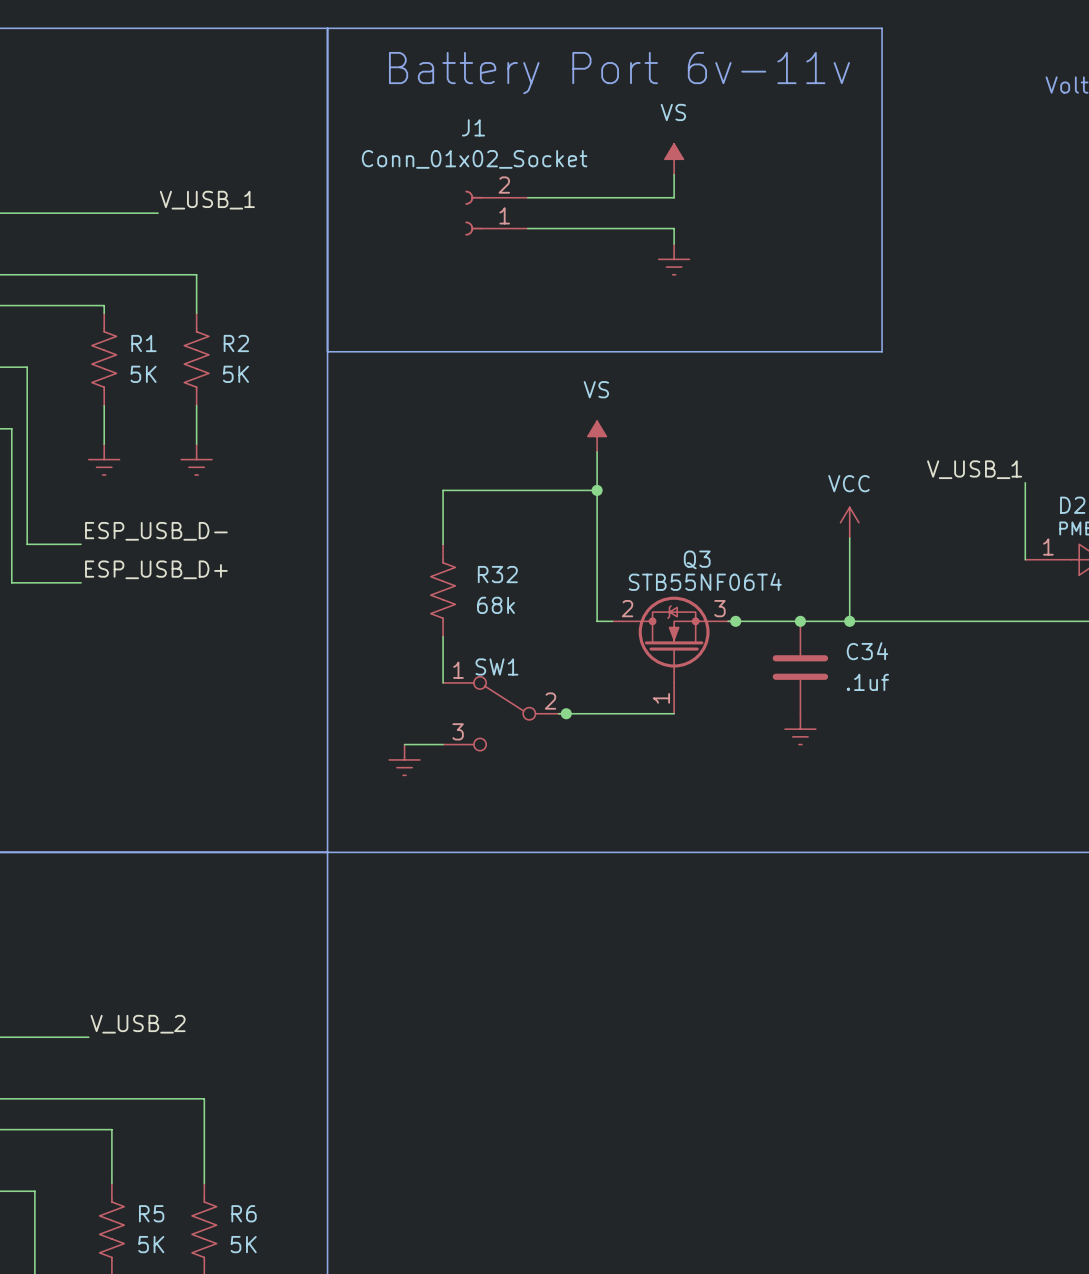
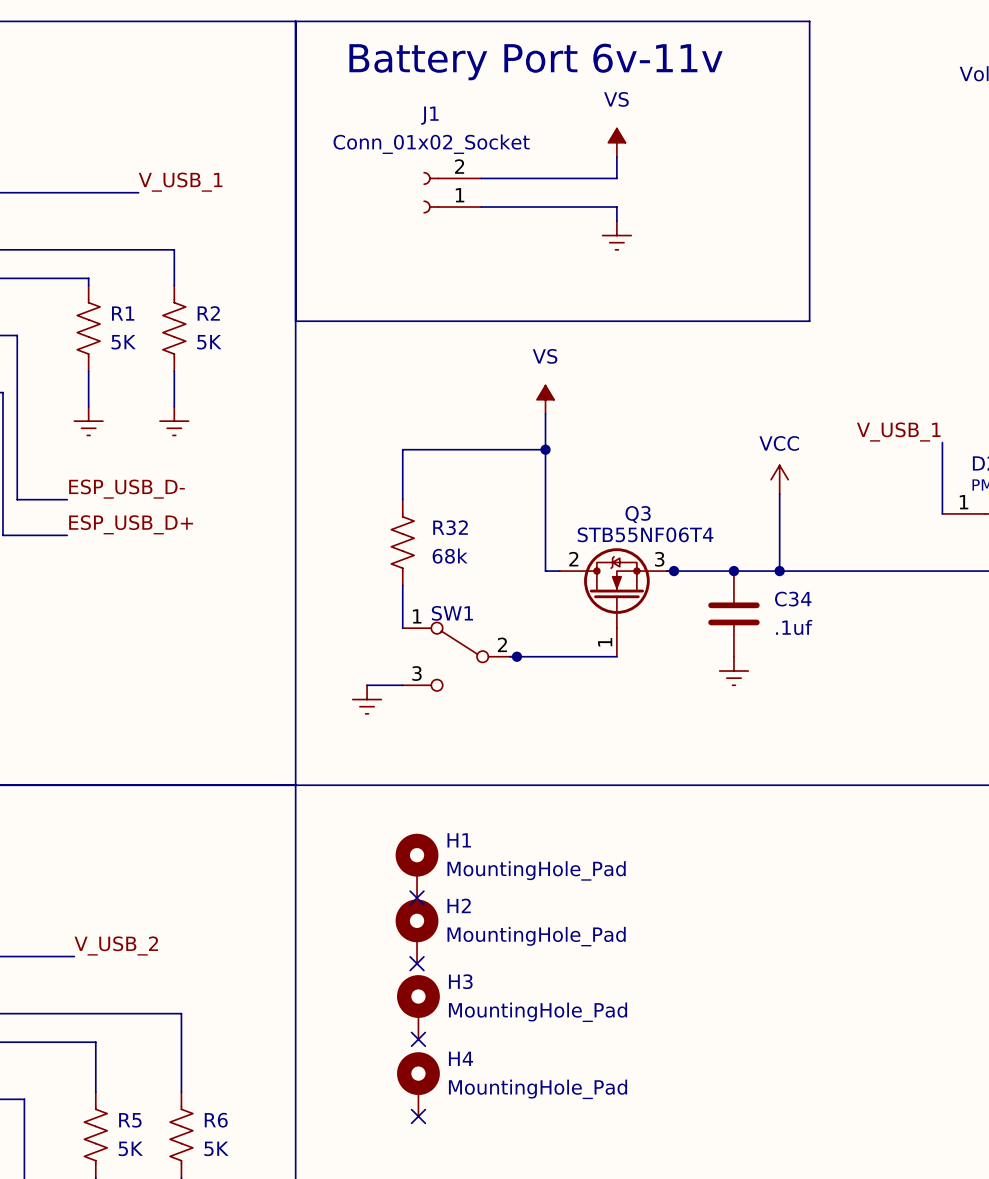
H1: none -> MountingHole_Pad (417, 865)
no-connect mark: none -> (417, 898)
H2: none -> MountingHole_Pad (417, 931)
no-connect mark: none -> (417, 963)
H3: none -> MountingHole_Pad (418, 1007)
no-connect mark: none -> (418, 1039)
H4: none -> MountingHole_Pad (418, 1084)
no-connect mark: none -> (418, 1116)

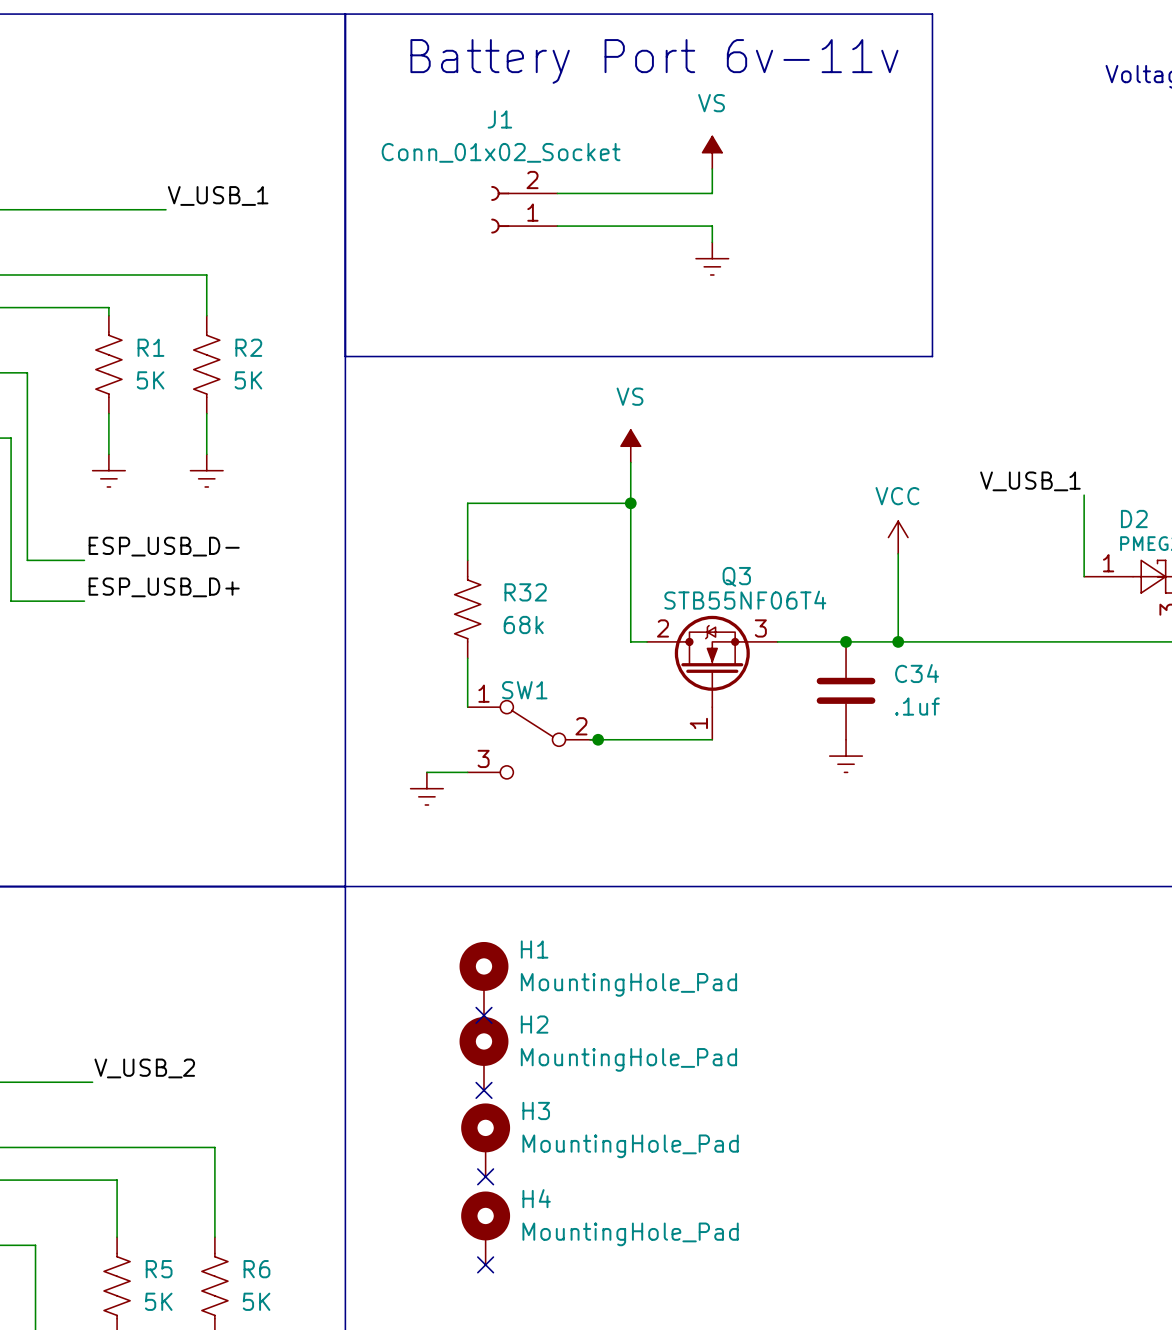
junction: (674, 571) -> none

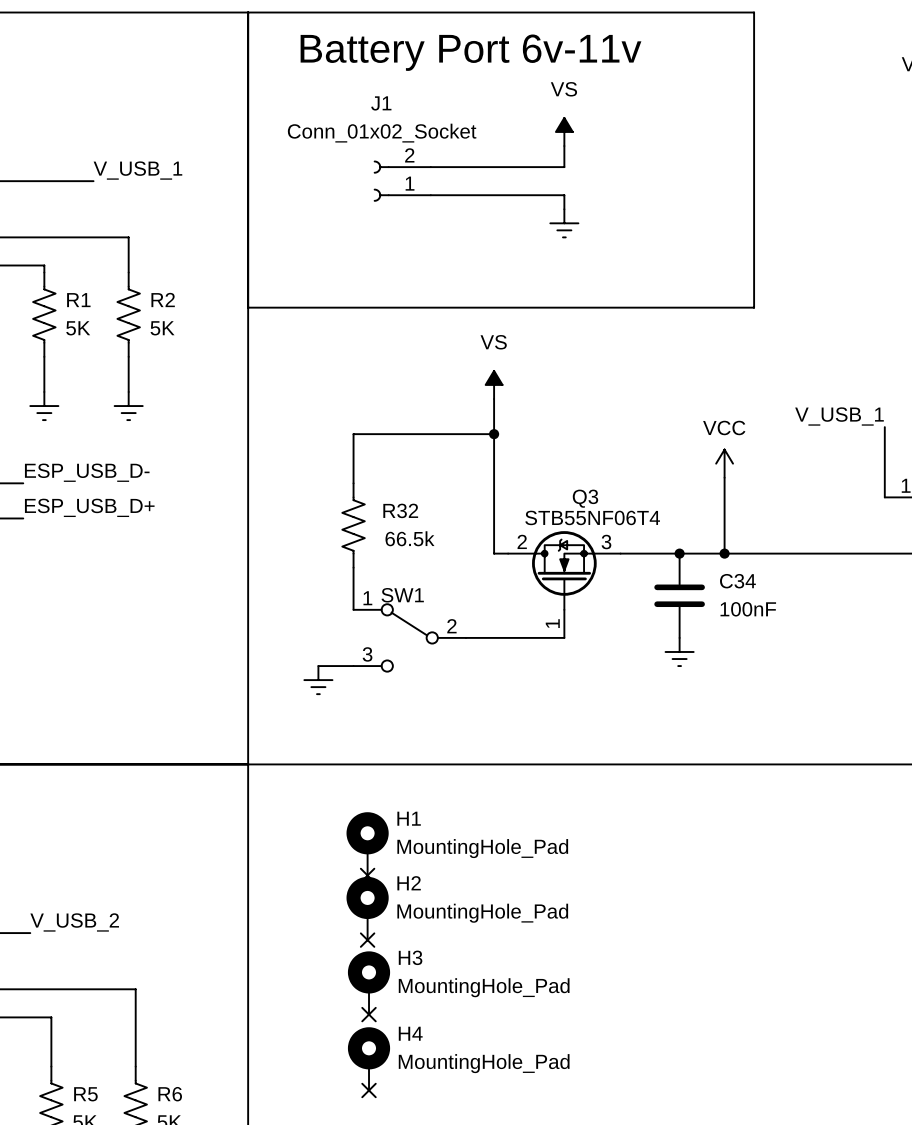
R32 value: 68k (523, 625) -> 66.5k (409, 538)
C34 value: .1uf (917, 706) -> 100nF (748, 609)
junction: (598, 739) -> none

